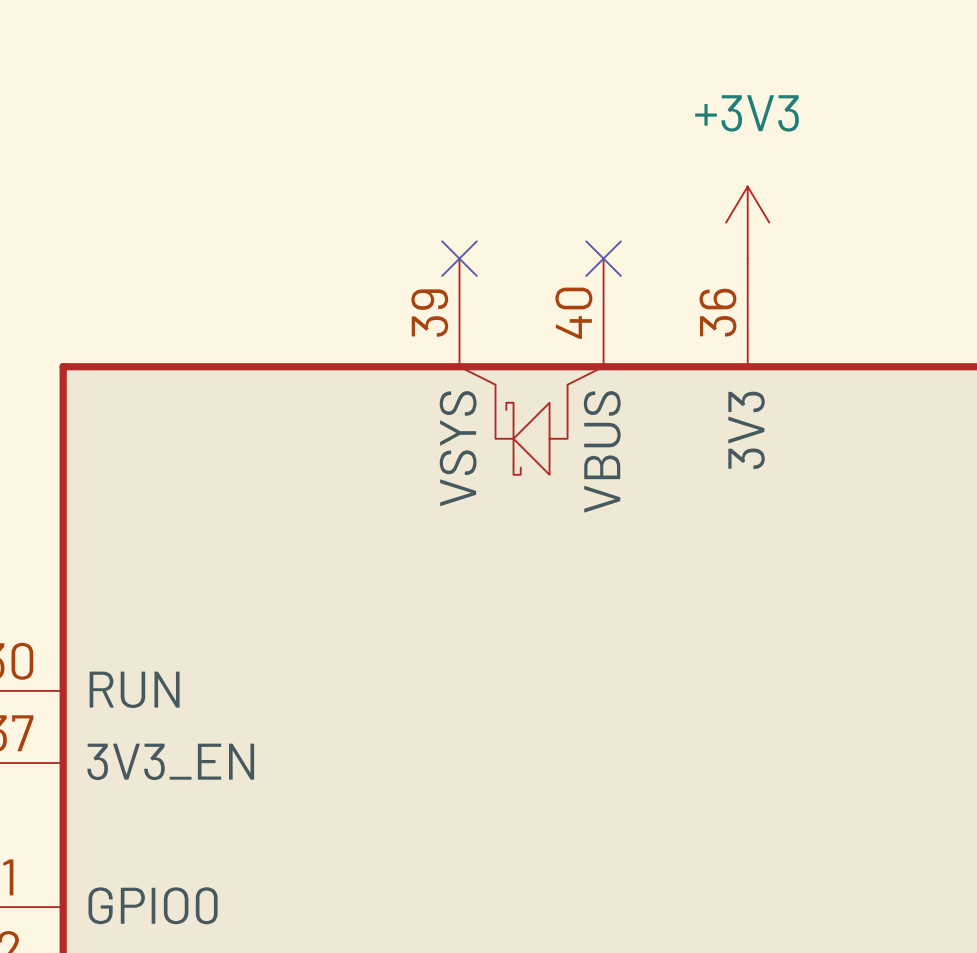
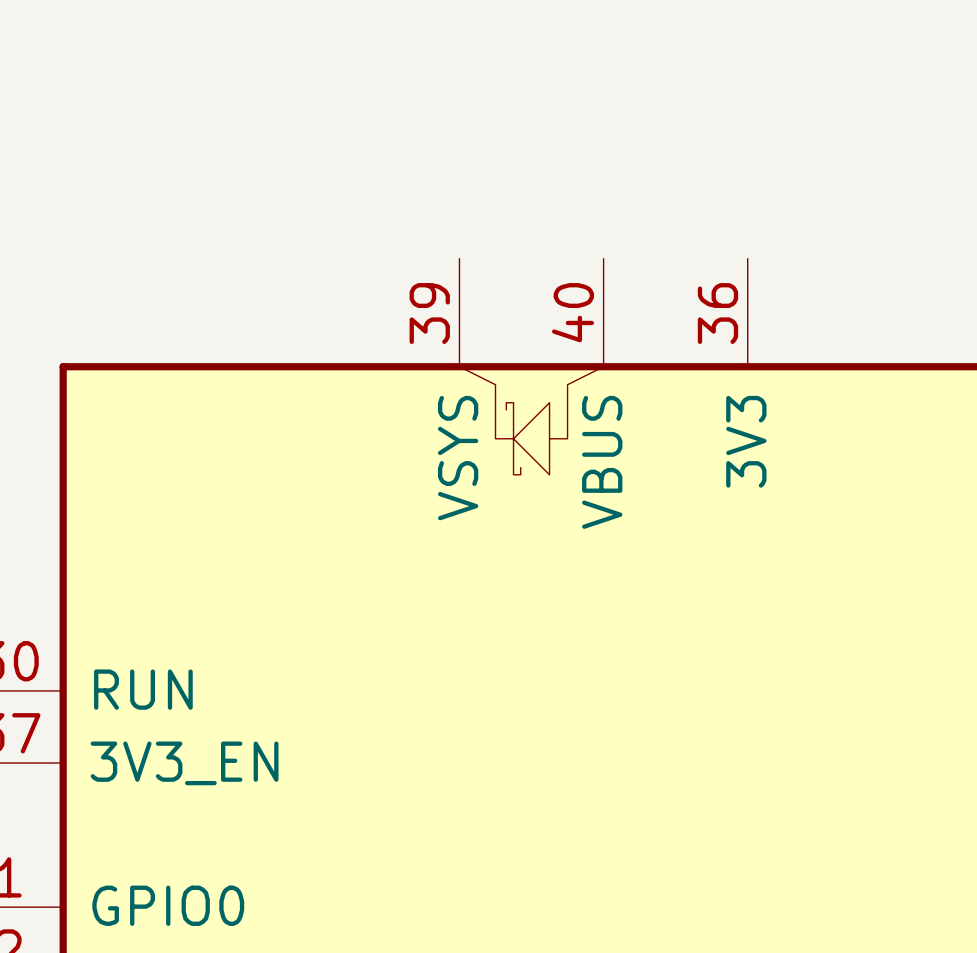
power symbol: +3V3 (747, 222) -> none
no-connect mark: (459, 258) -> none
no-connect mark: (603, 258) -> none

